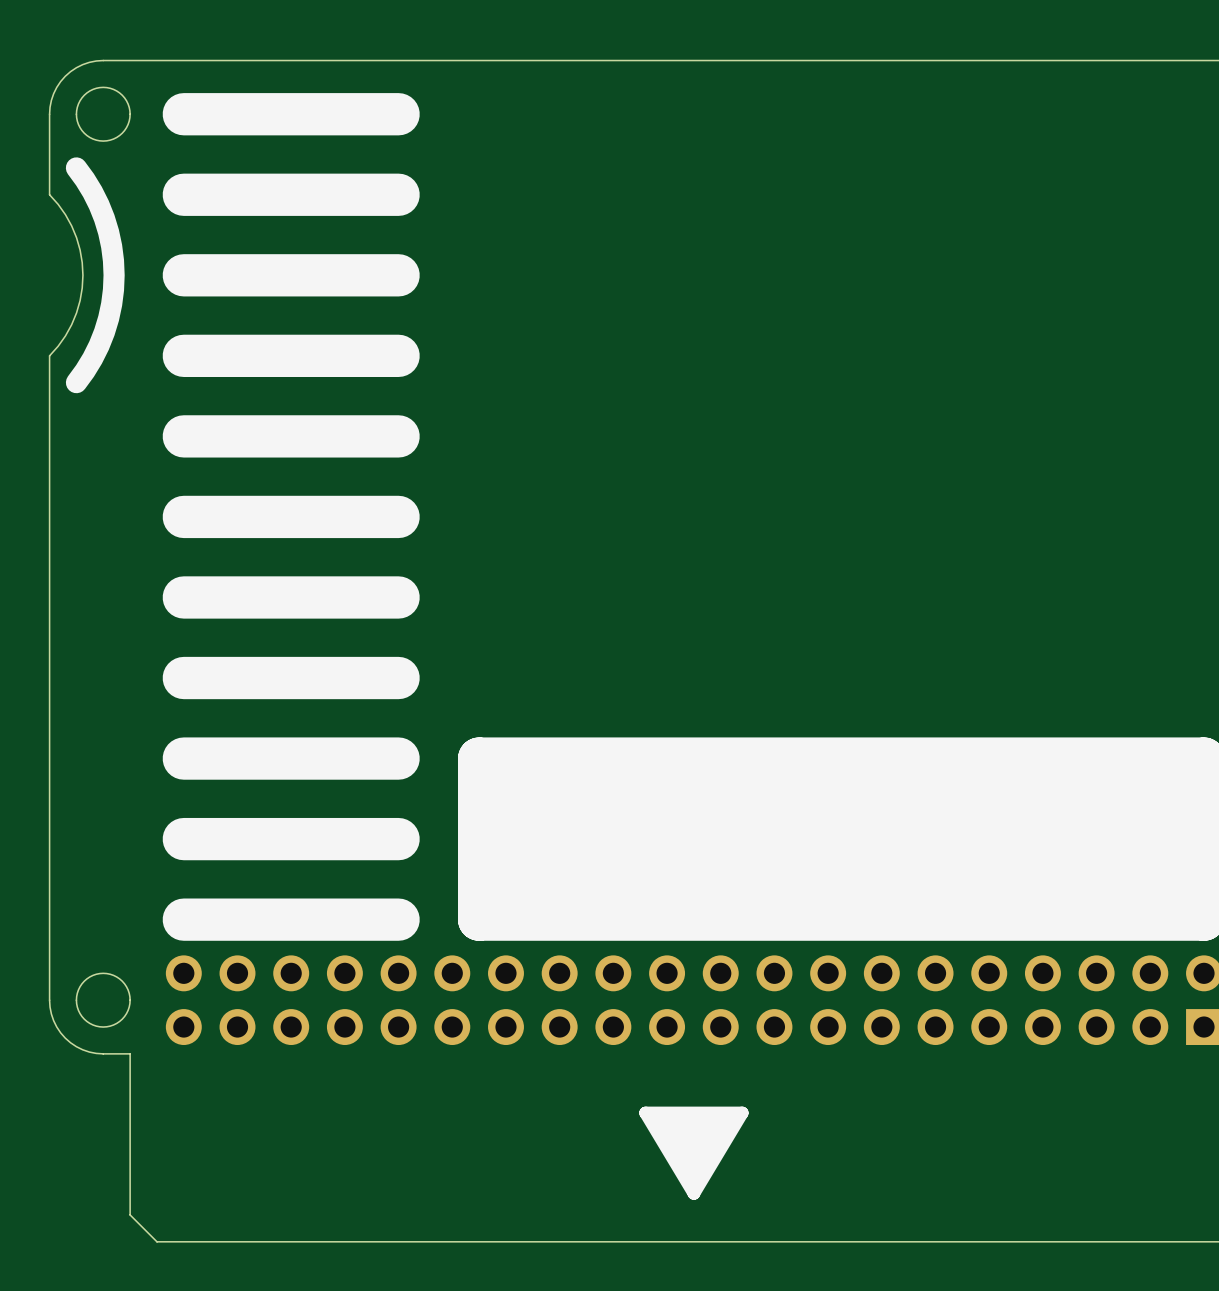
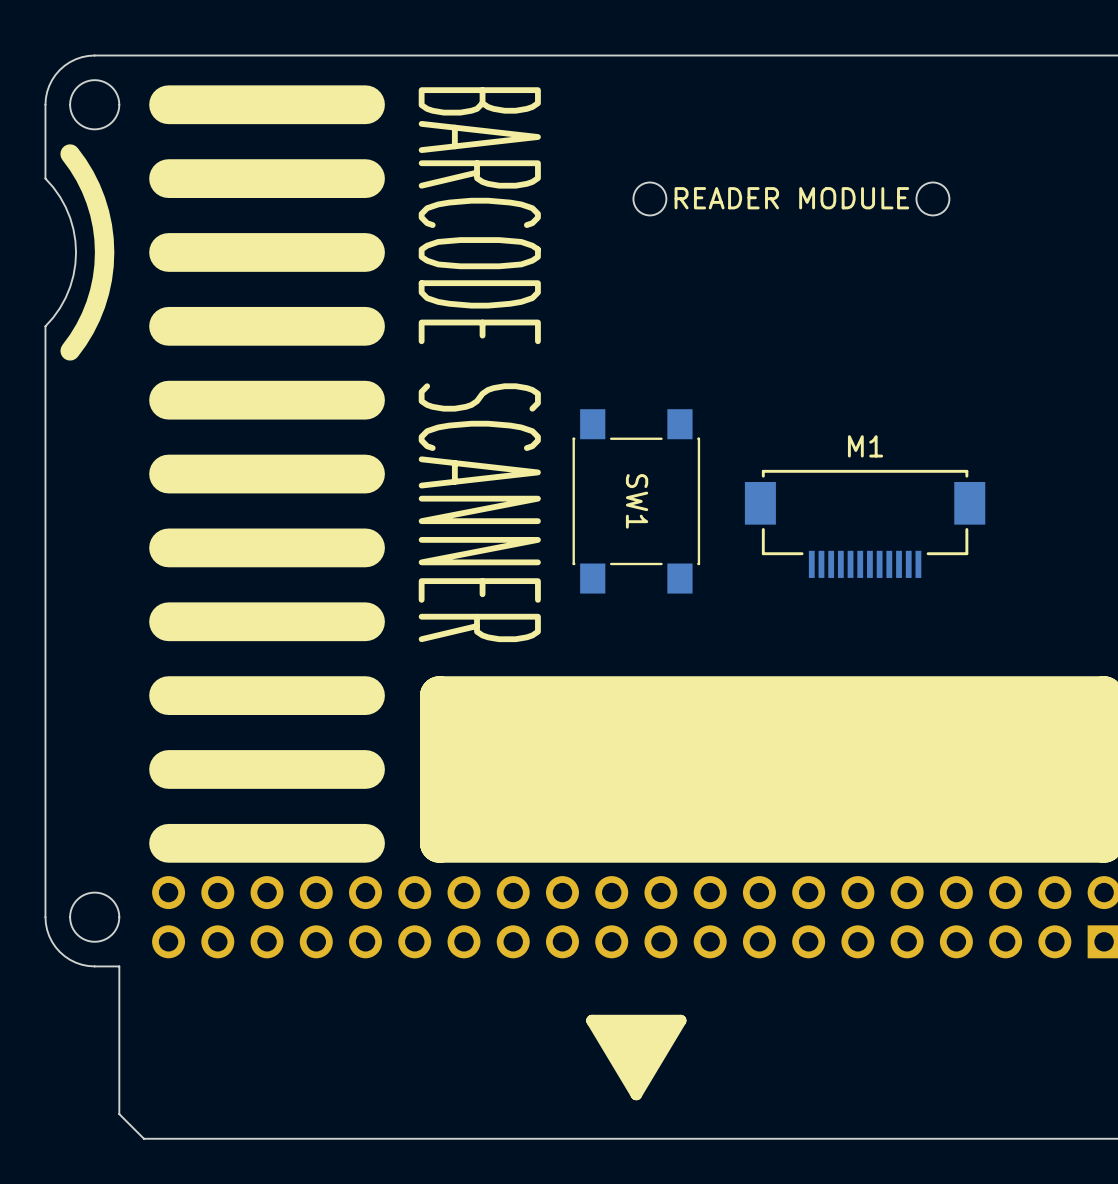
READER MODULE: none -> (791, 198)
text: none -> BARCODE SCANNER (479, 364)
SW1: none -> (636, 501)
M1: none -> (865, 523)

